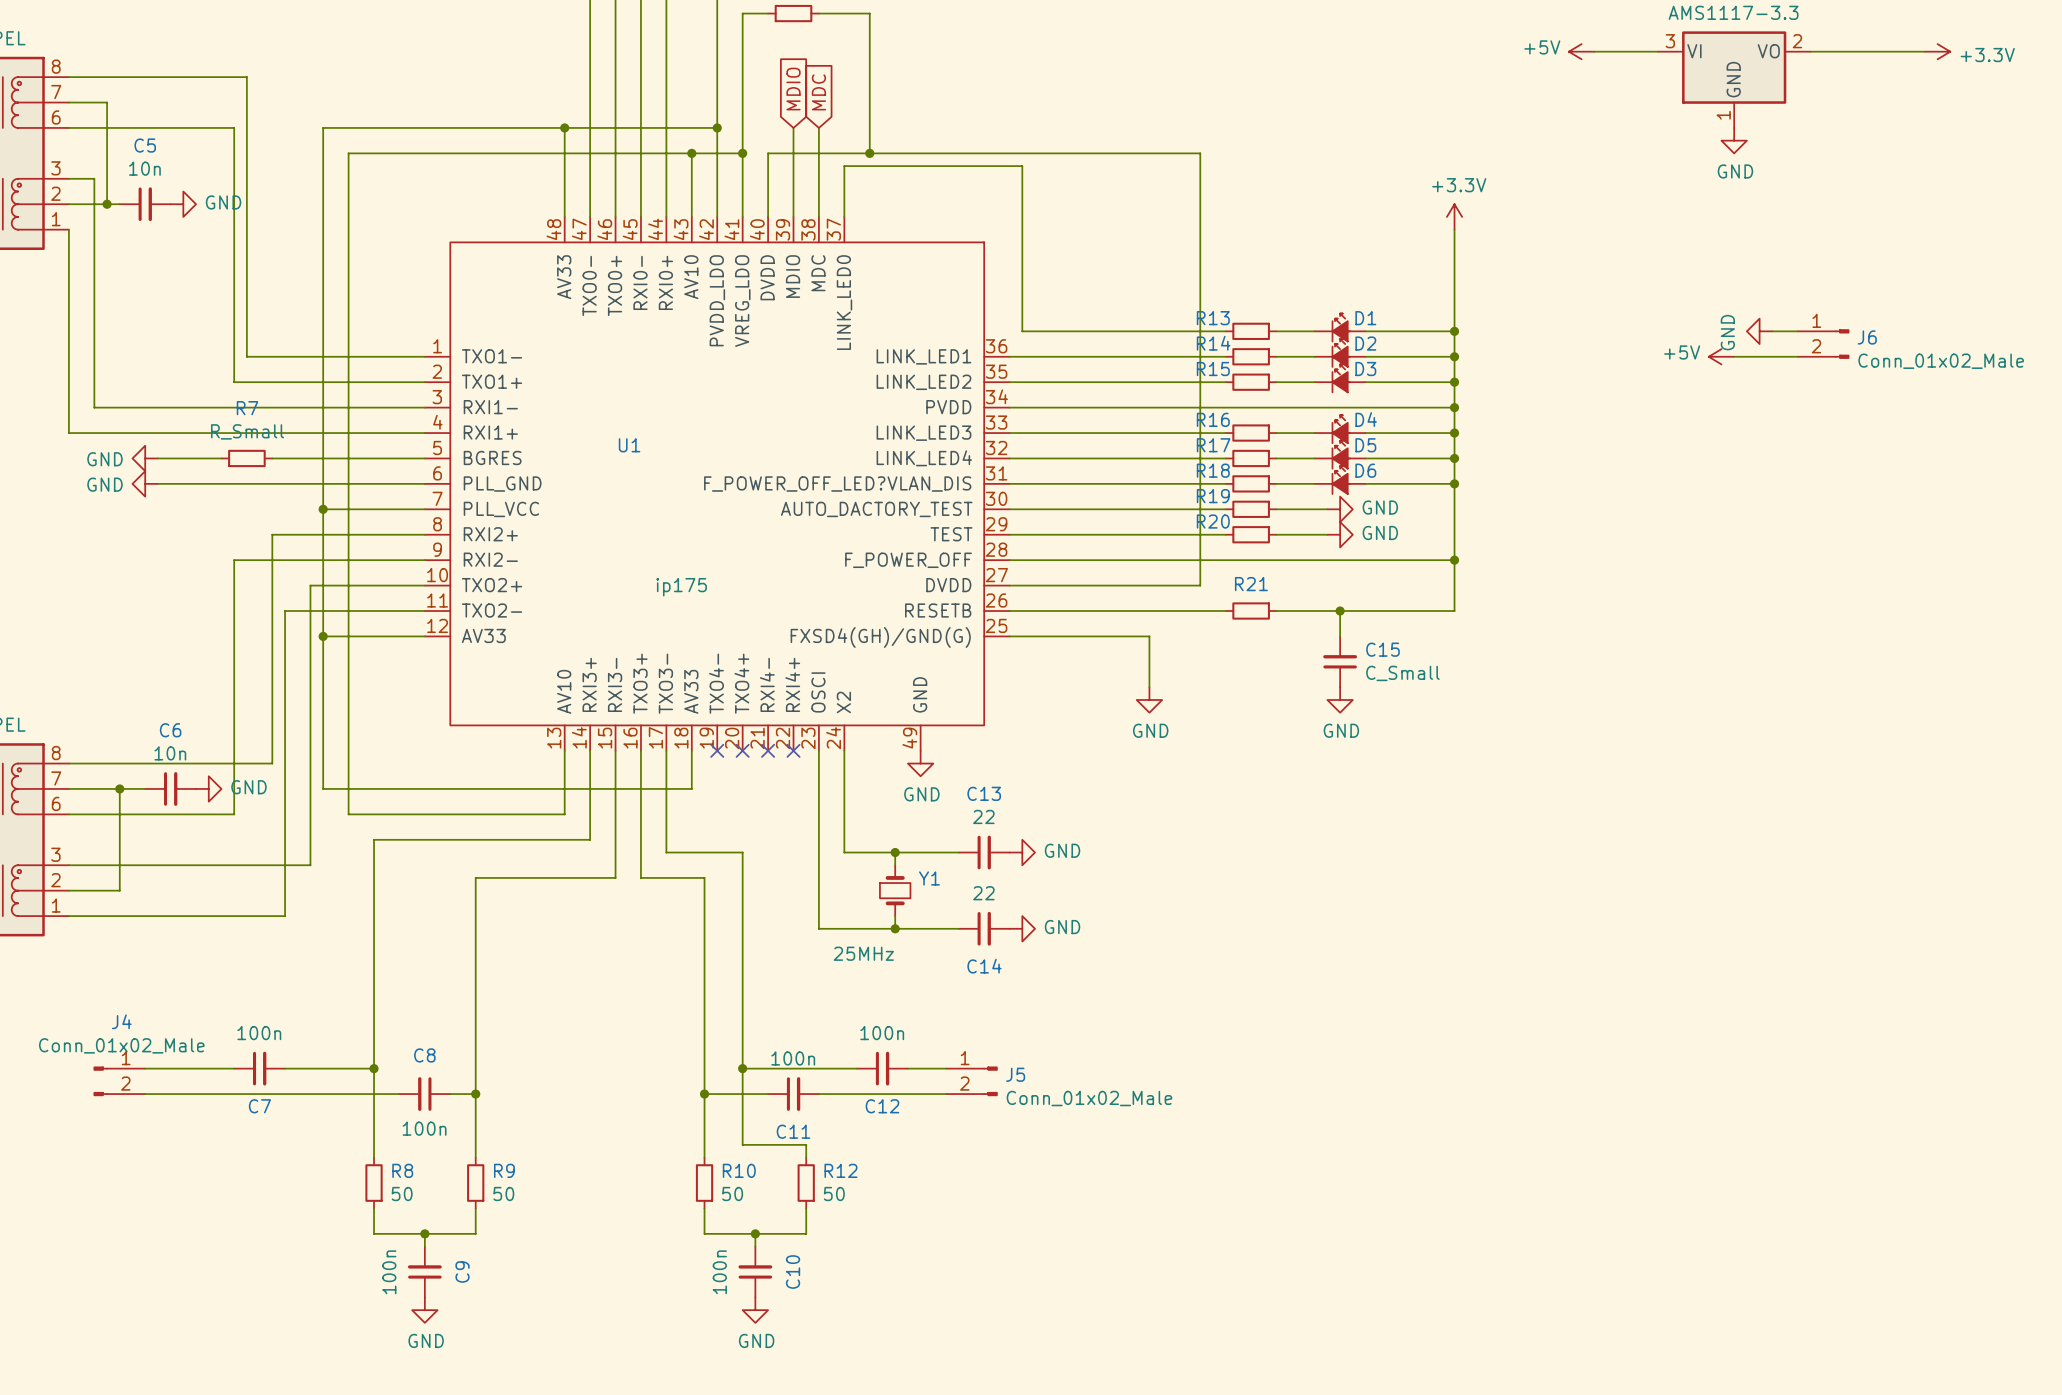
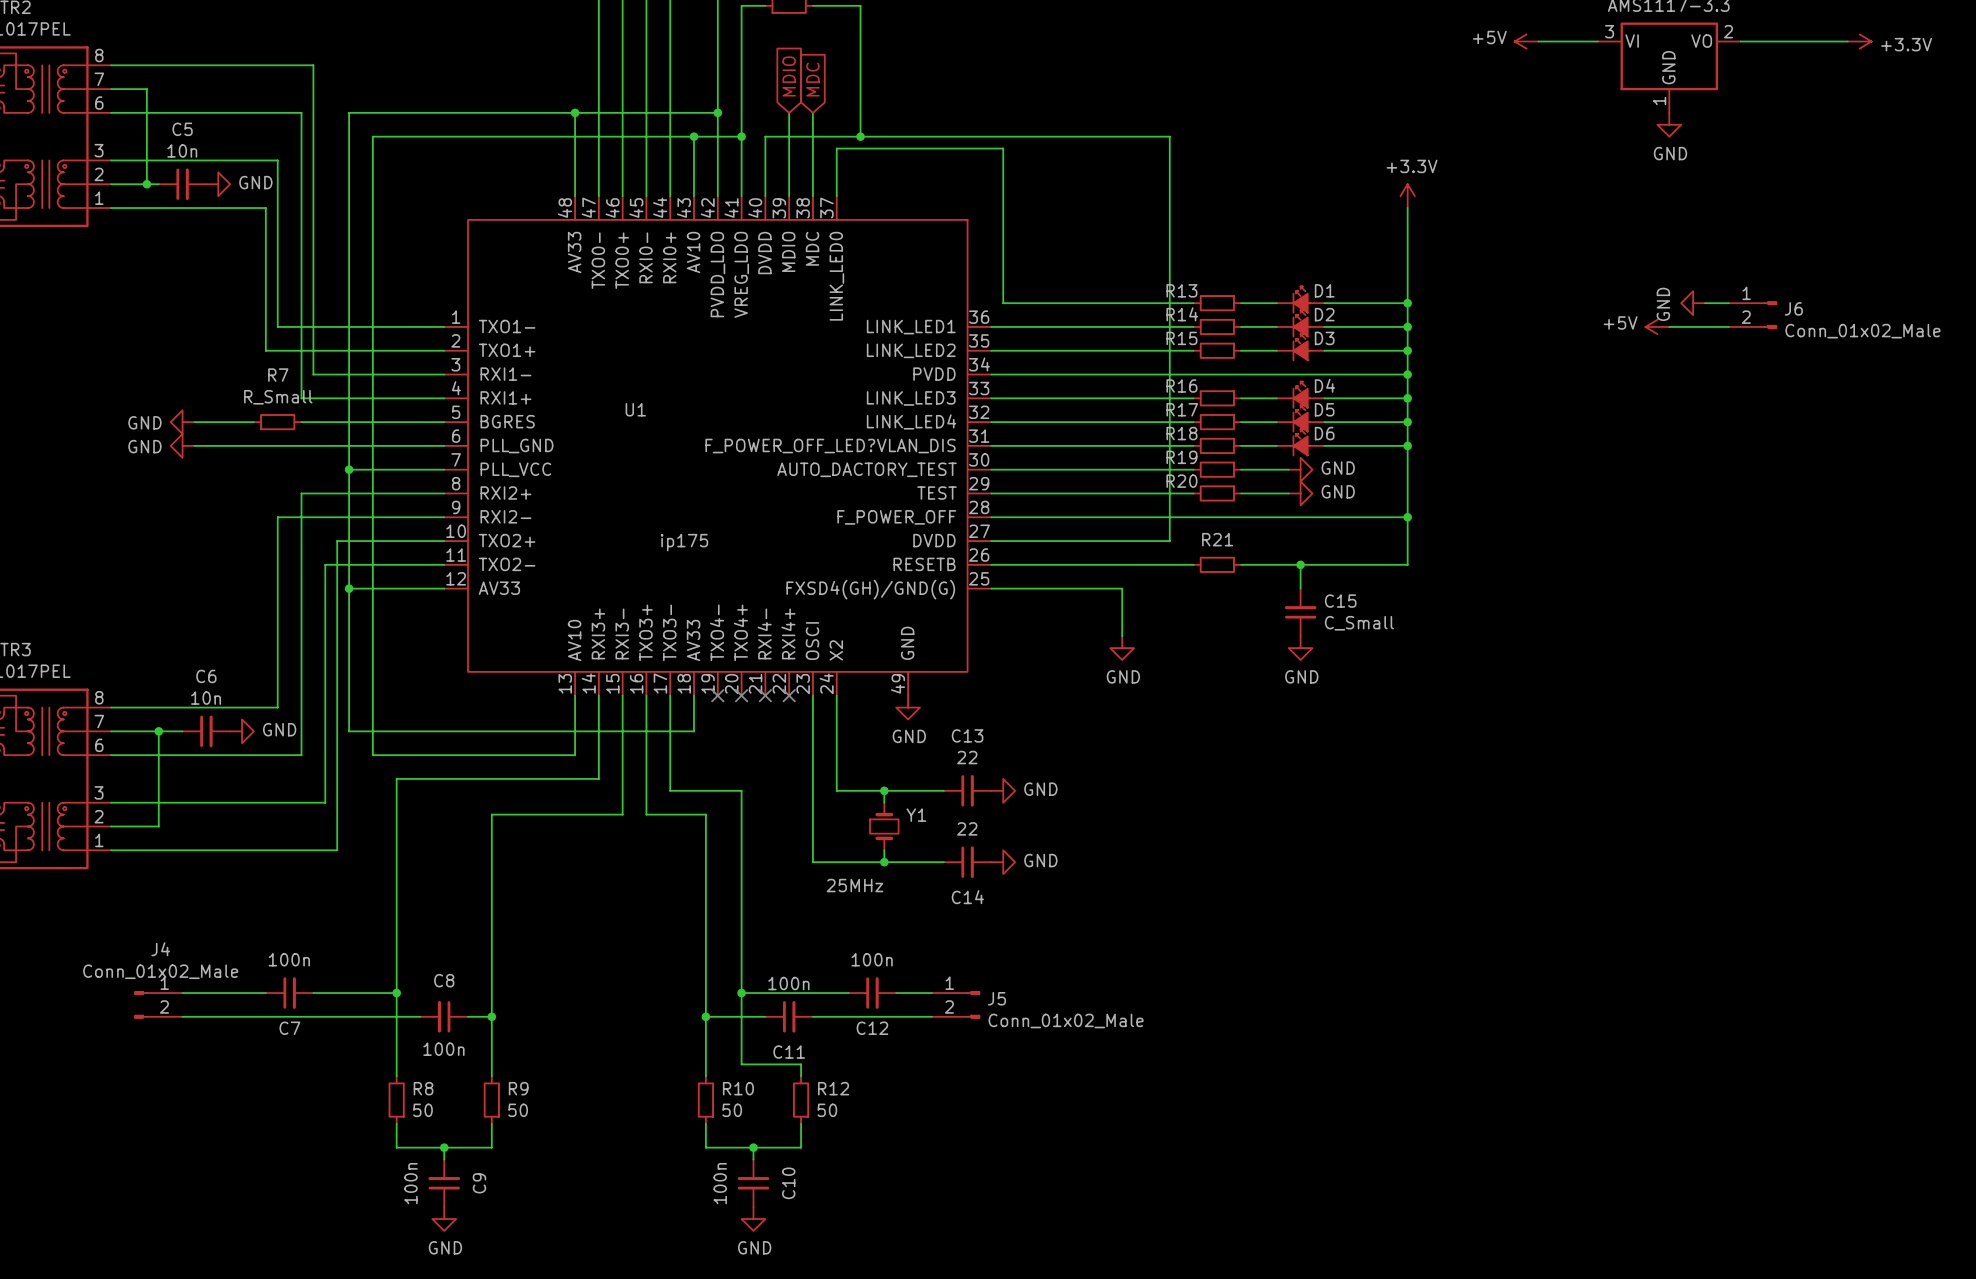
wire: (246, 77) (246, 178) -> (135, 160) (277, 160)
wire: (234, 127) (234, 229) -> (111, 208) (265, 208)
wire: (94, 178) (94, 407) (285, 407) -> (277, 65) (313, 65) (313, 374)
wire: (68, 229) (68, 433) (272, 433) -> (265, 112) (301, 112) (301, 398)
wire: (246, 560) (234, 560) (234, 814) -> (277, 517) (277, 707)
wire: (297, 611) (285, 611) (285, 916) -> (325, 564) (325, 802)
wire: (246, 763) (272, 763) -> (265, 755) (301, 755) (301, 707)
wire: (297, 865) (310, 865) -> (313, 850) (337, 850) (337, 802)

